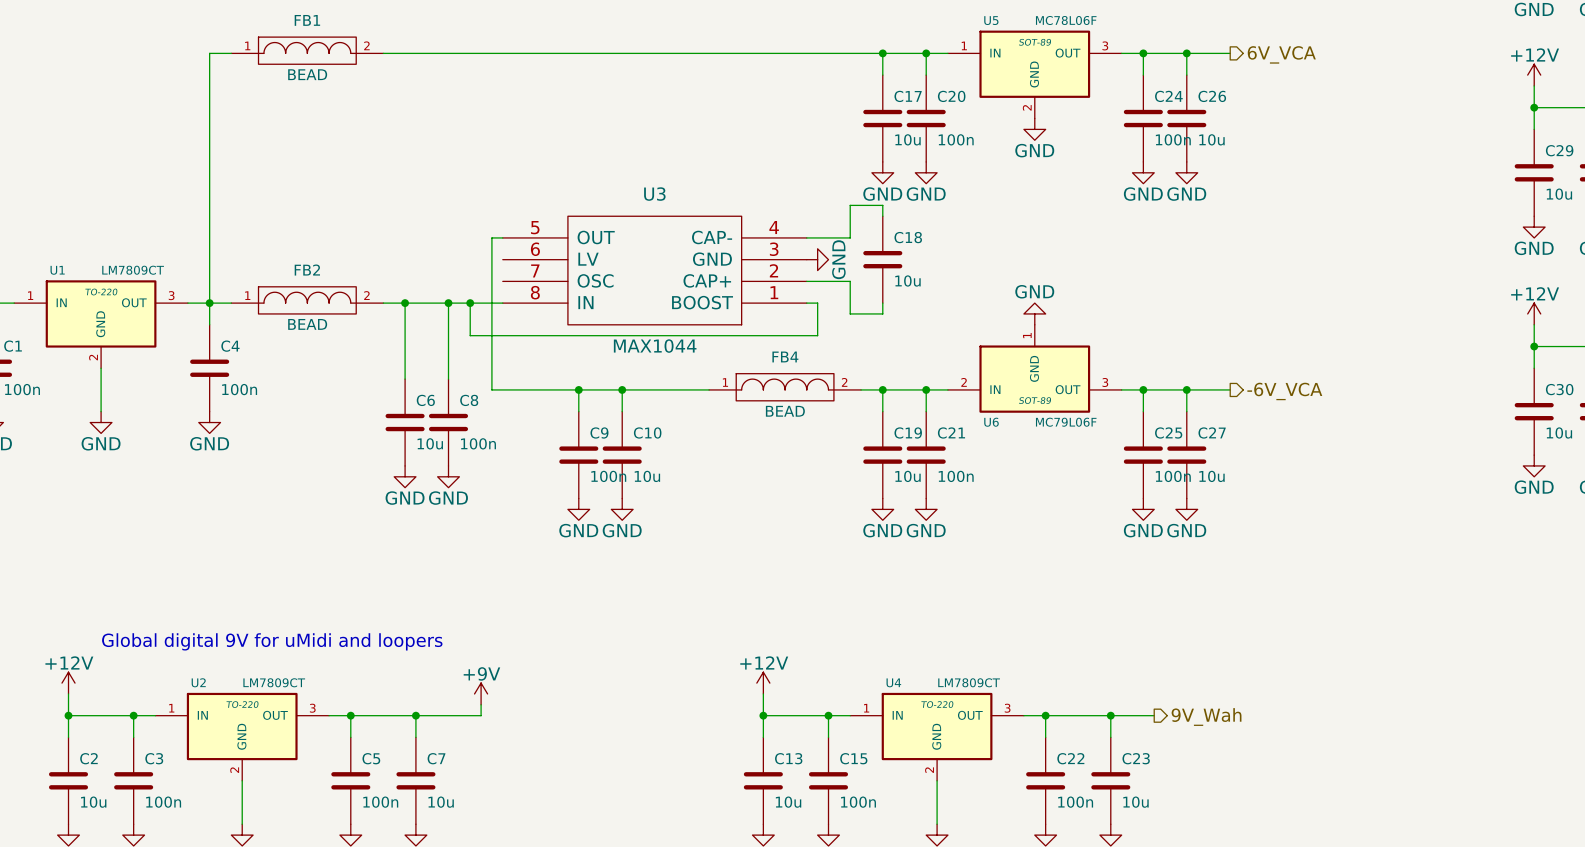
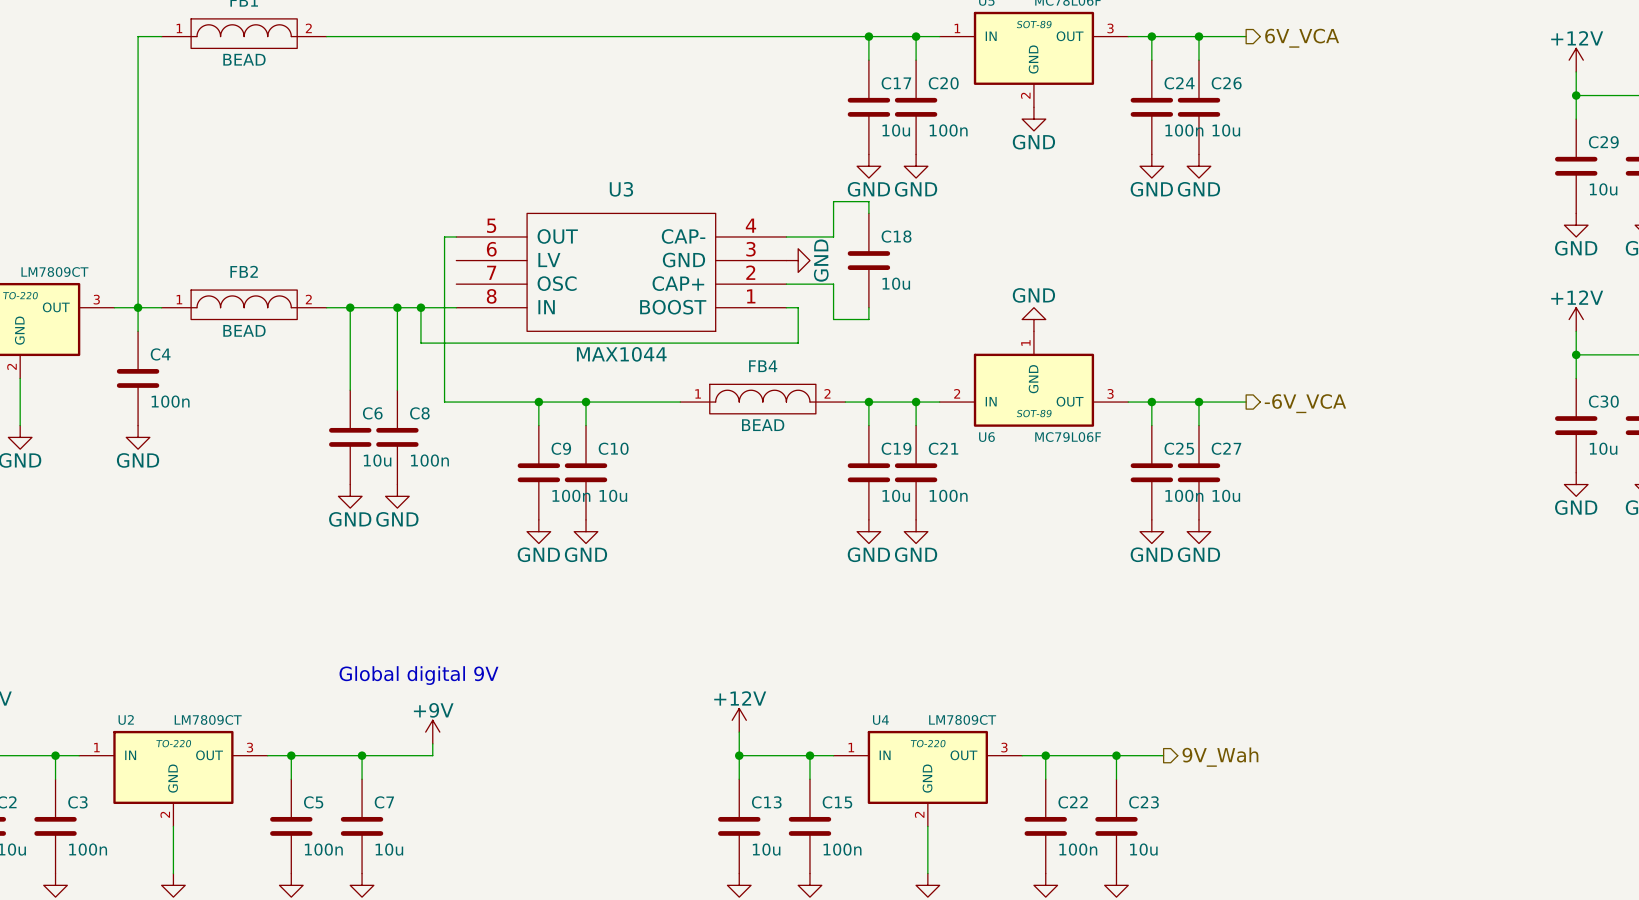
text: Global digital 9V for uMidi and loopers (272, 641) -> none
text: none -> Global digital 9V (418, 675)

